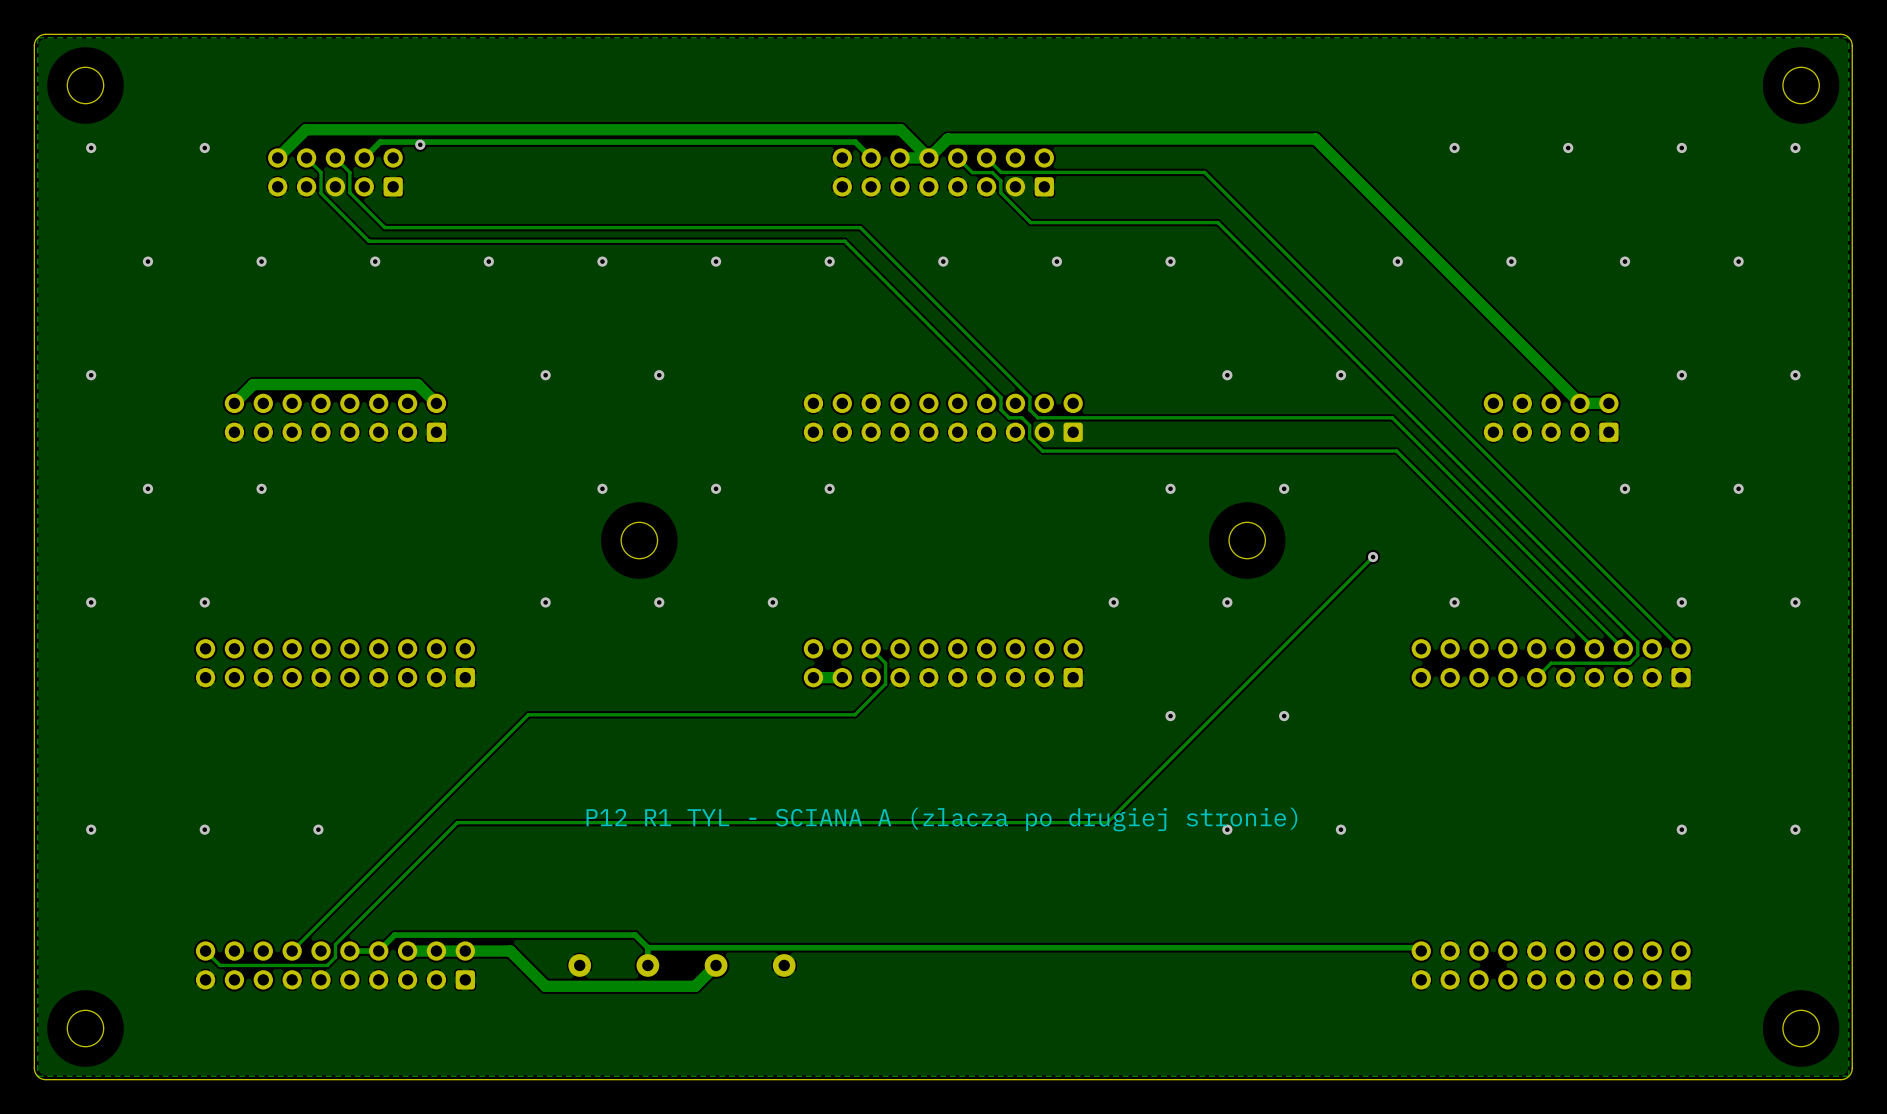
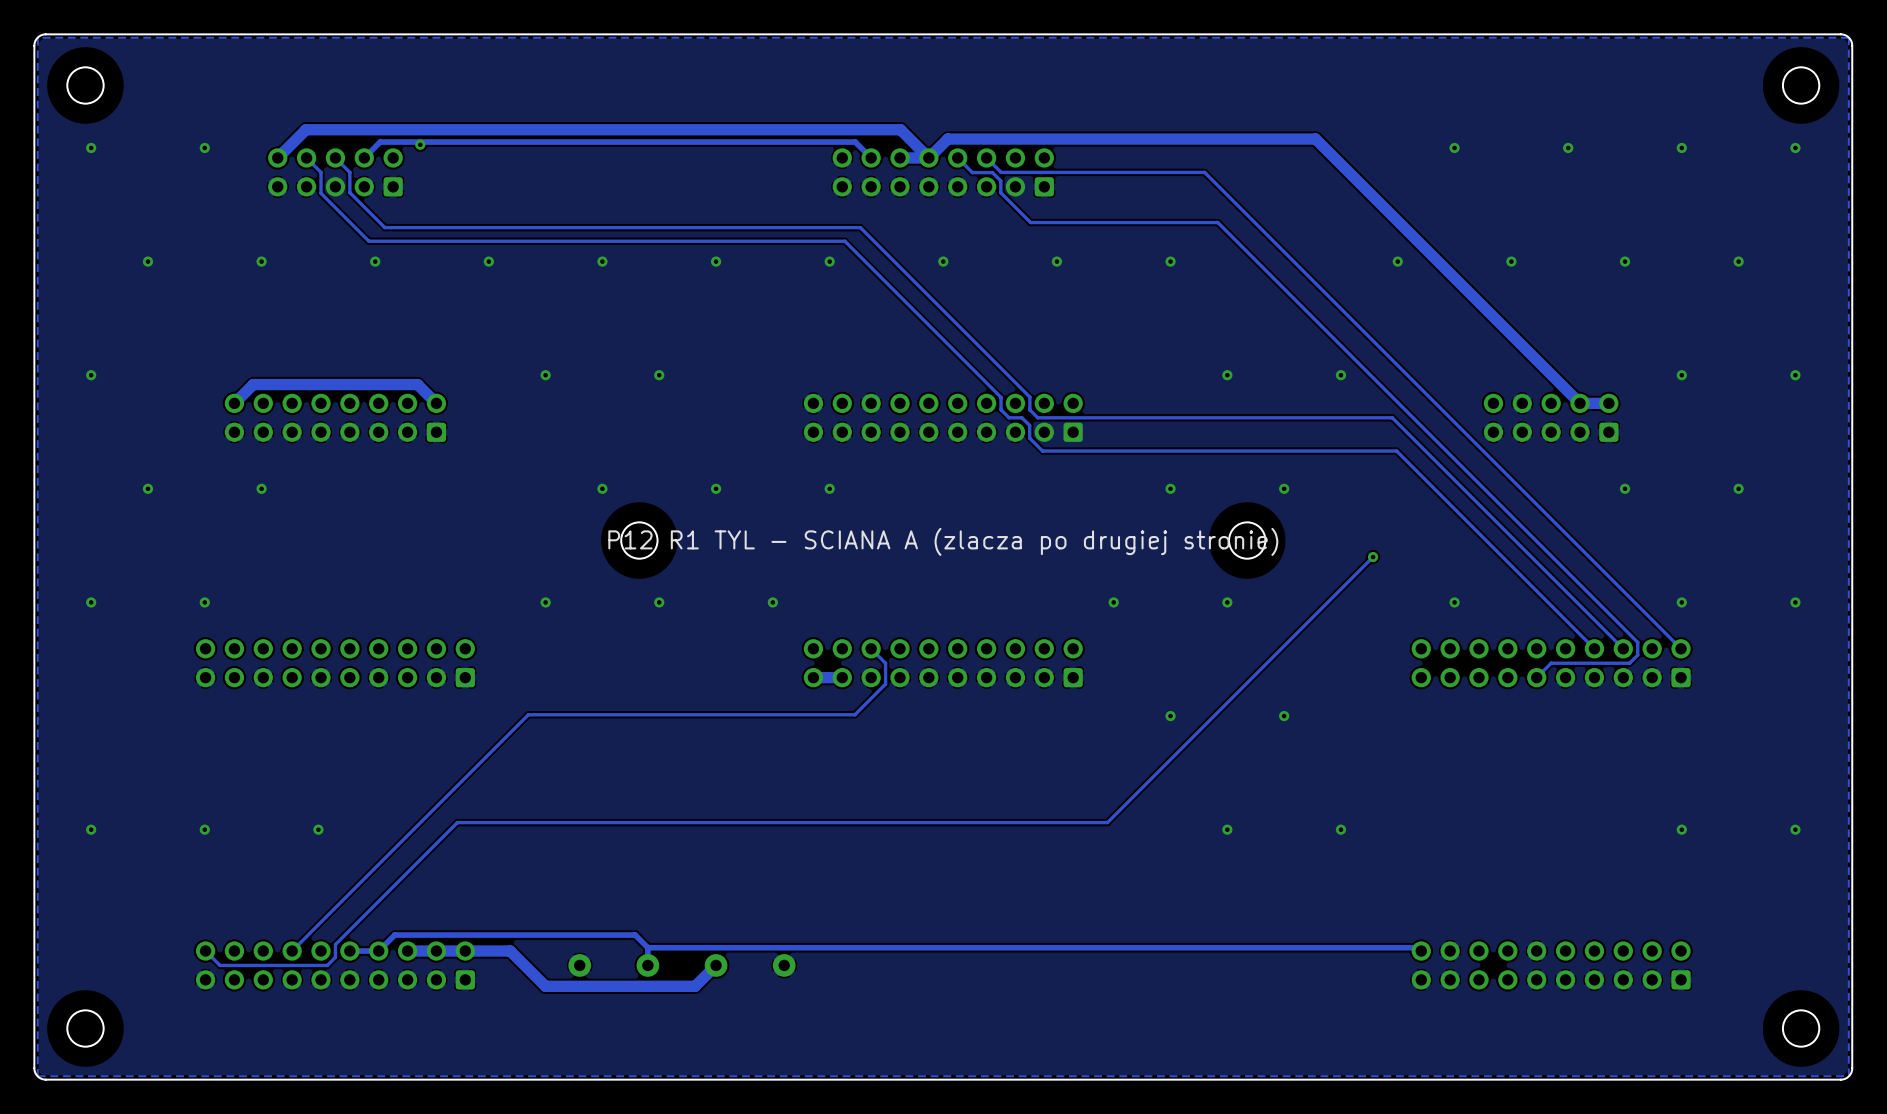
text position: P12 R1 TYL - SCIANA A (zlacza po drugiej stronie) (941, 819) -> P12 R1 TYL - SCIANA A (zlacza po drugiej stronie) (943, 541)

